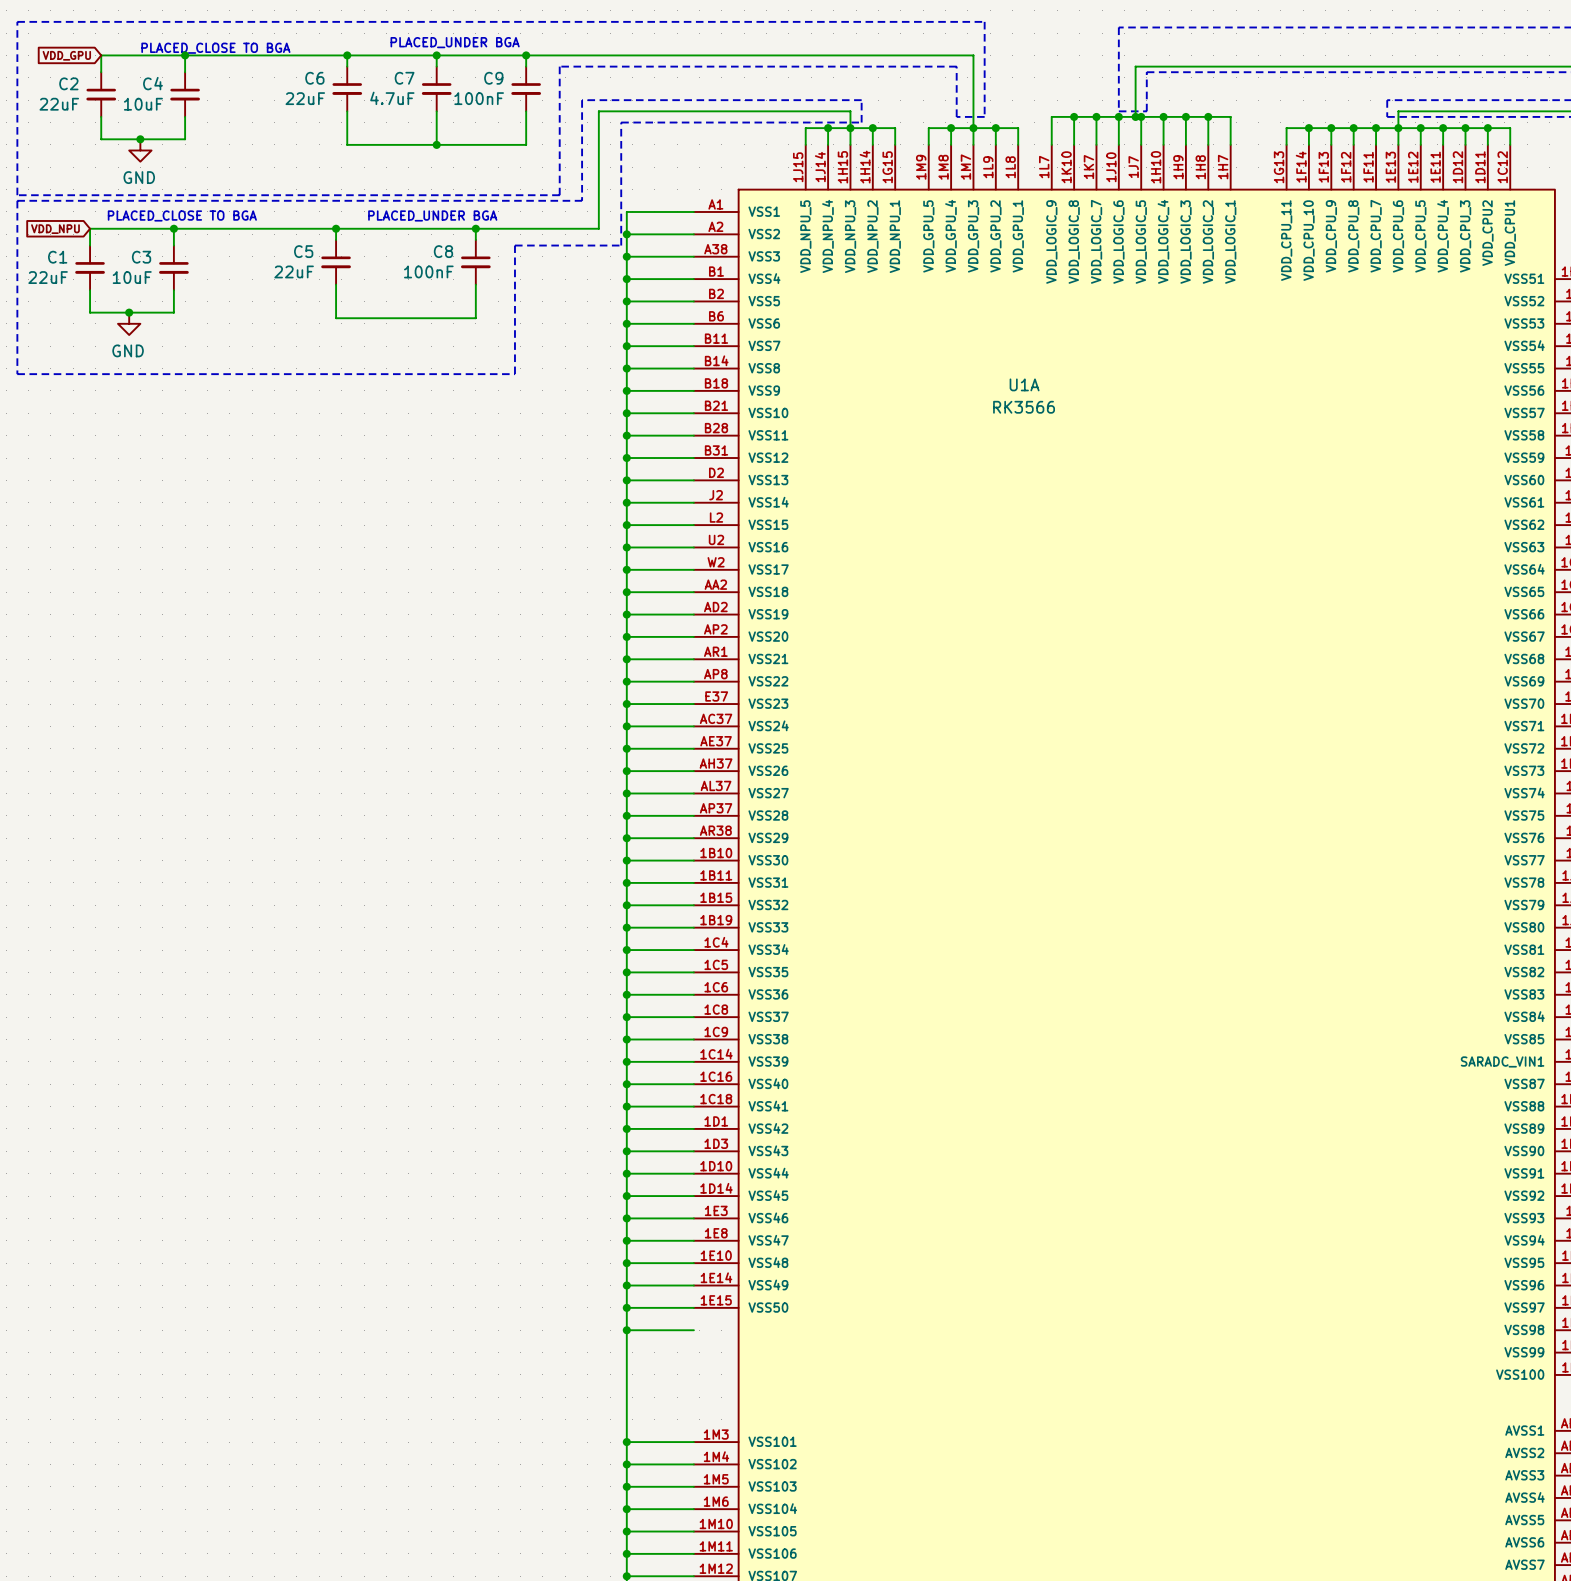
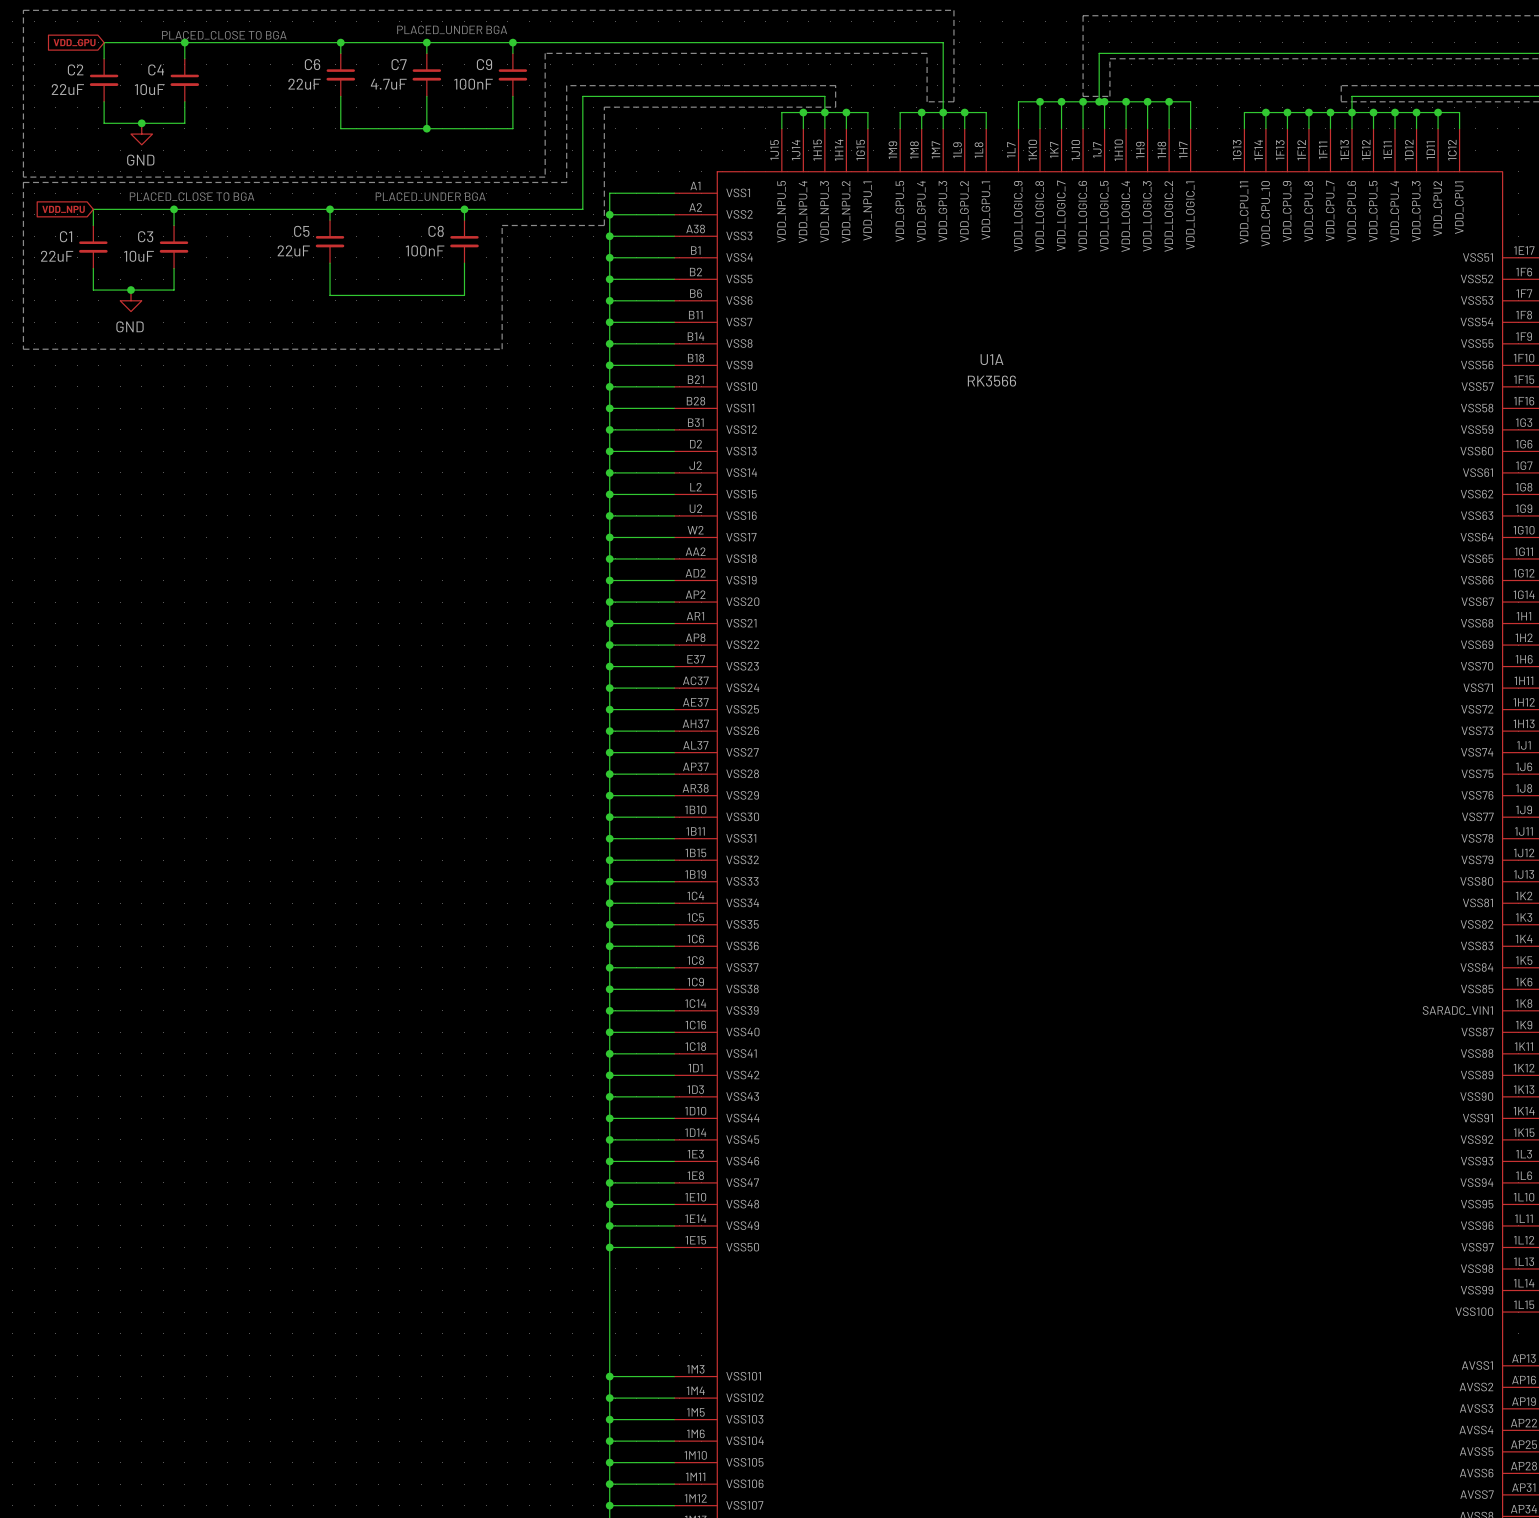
wire: (626, 1330) (693, 1330) -> none
junction: (626, 1330) -> none

